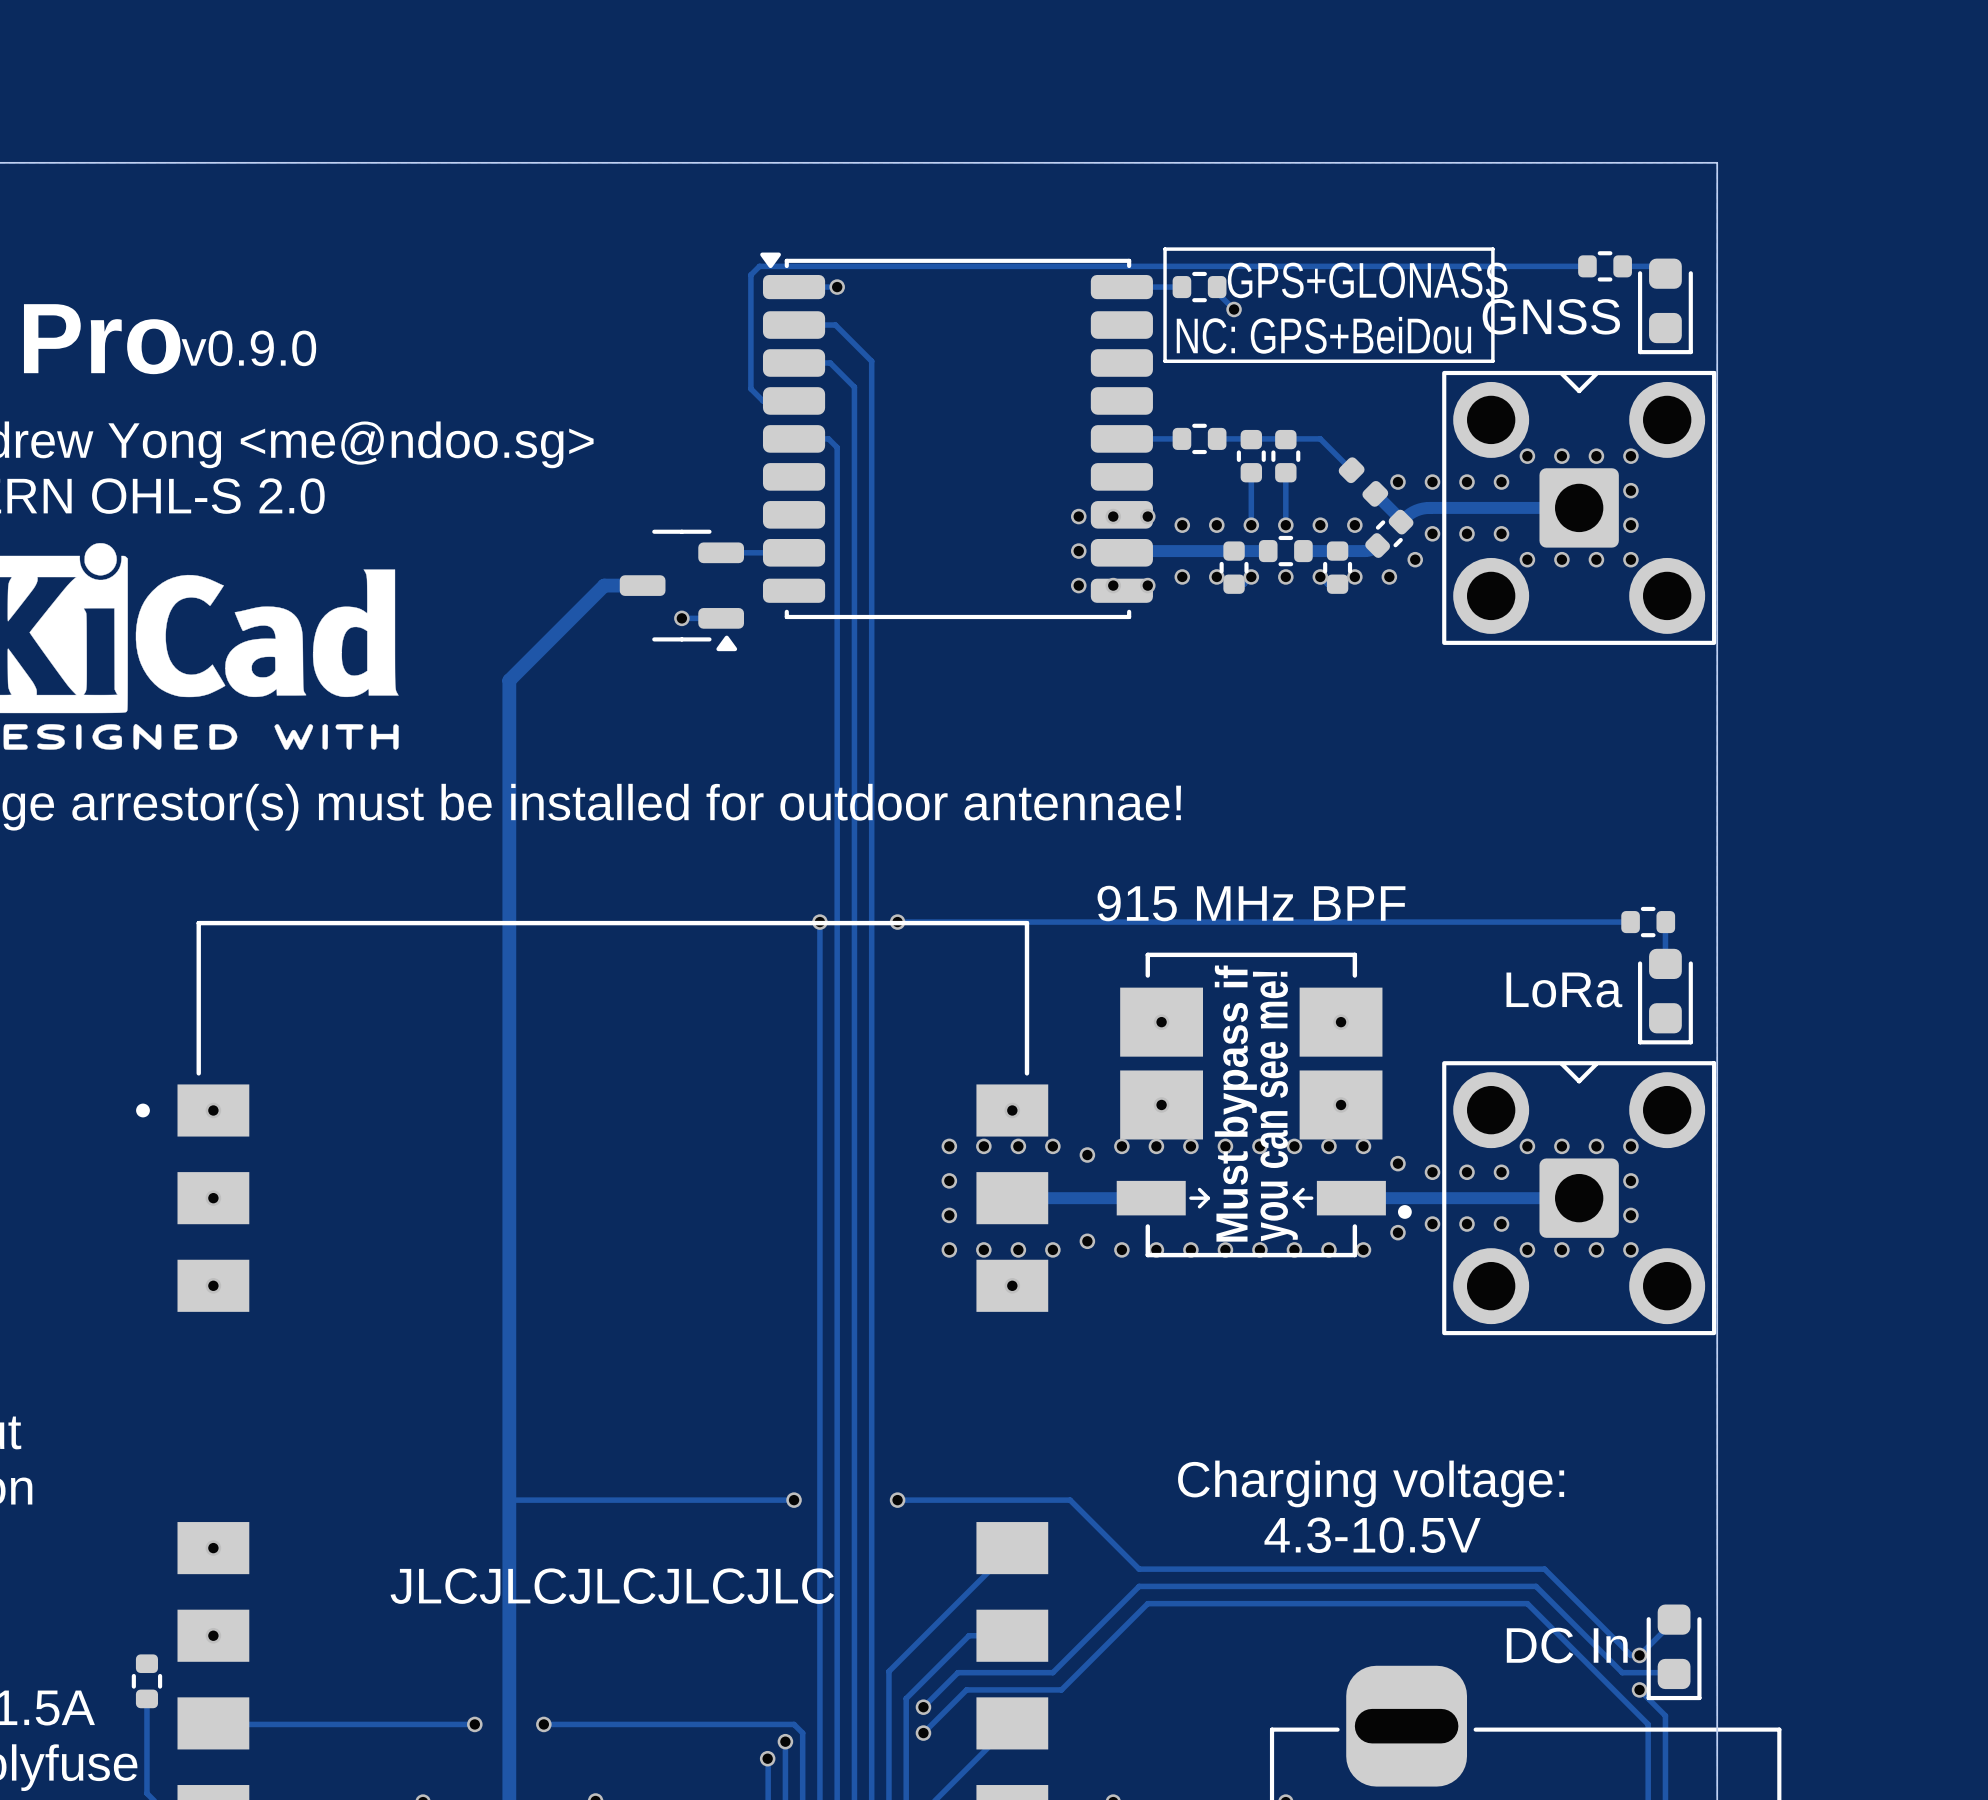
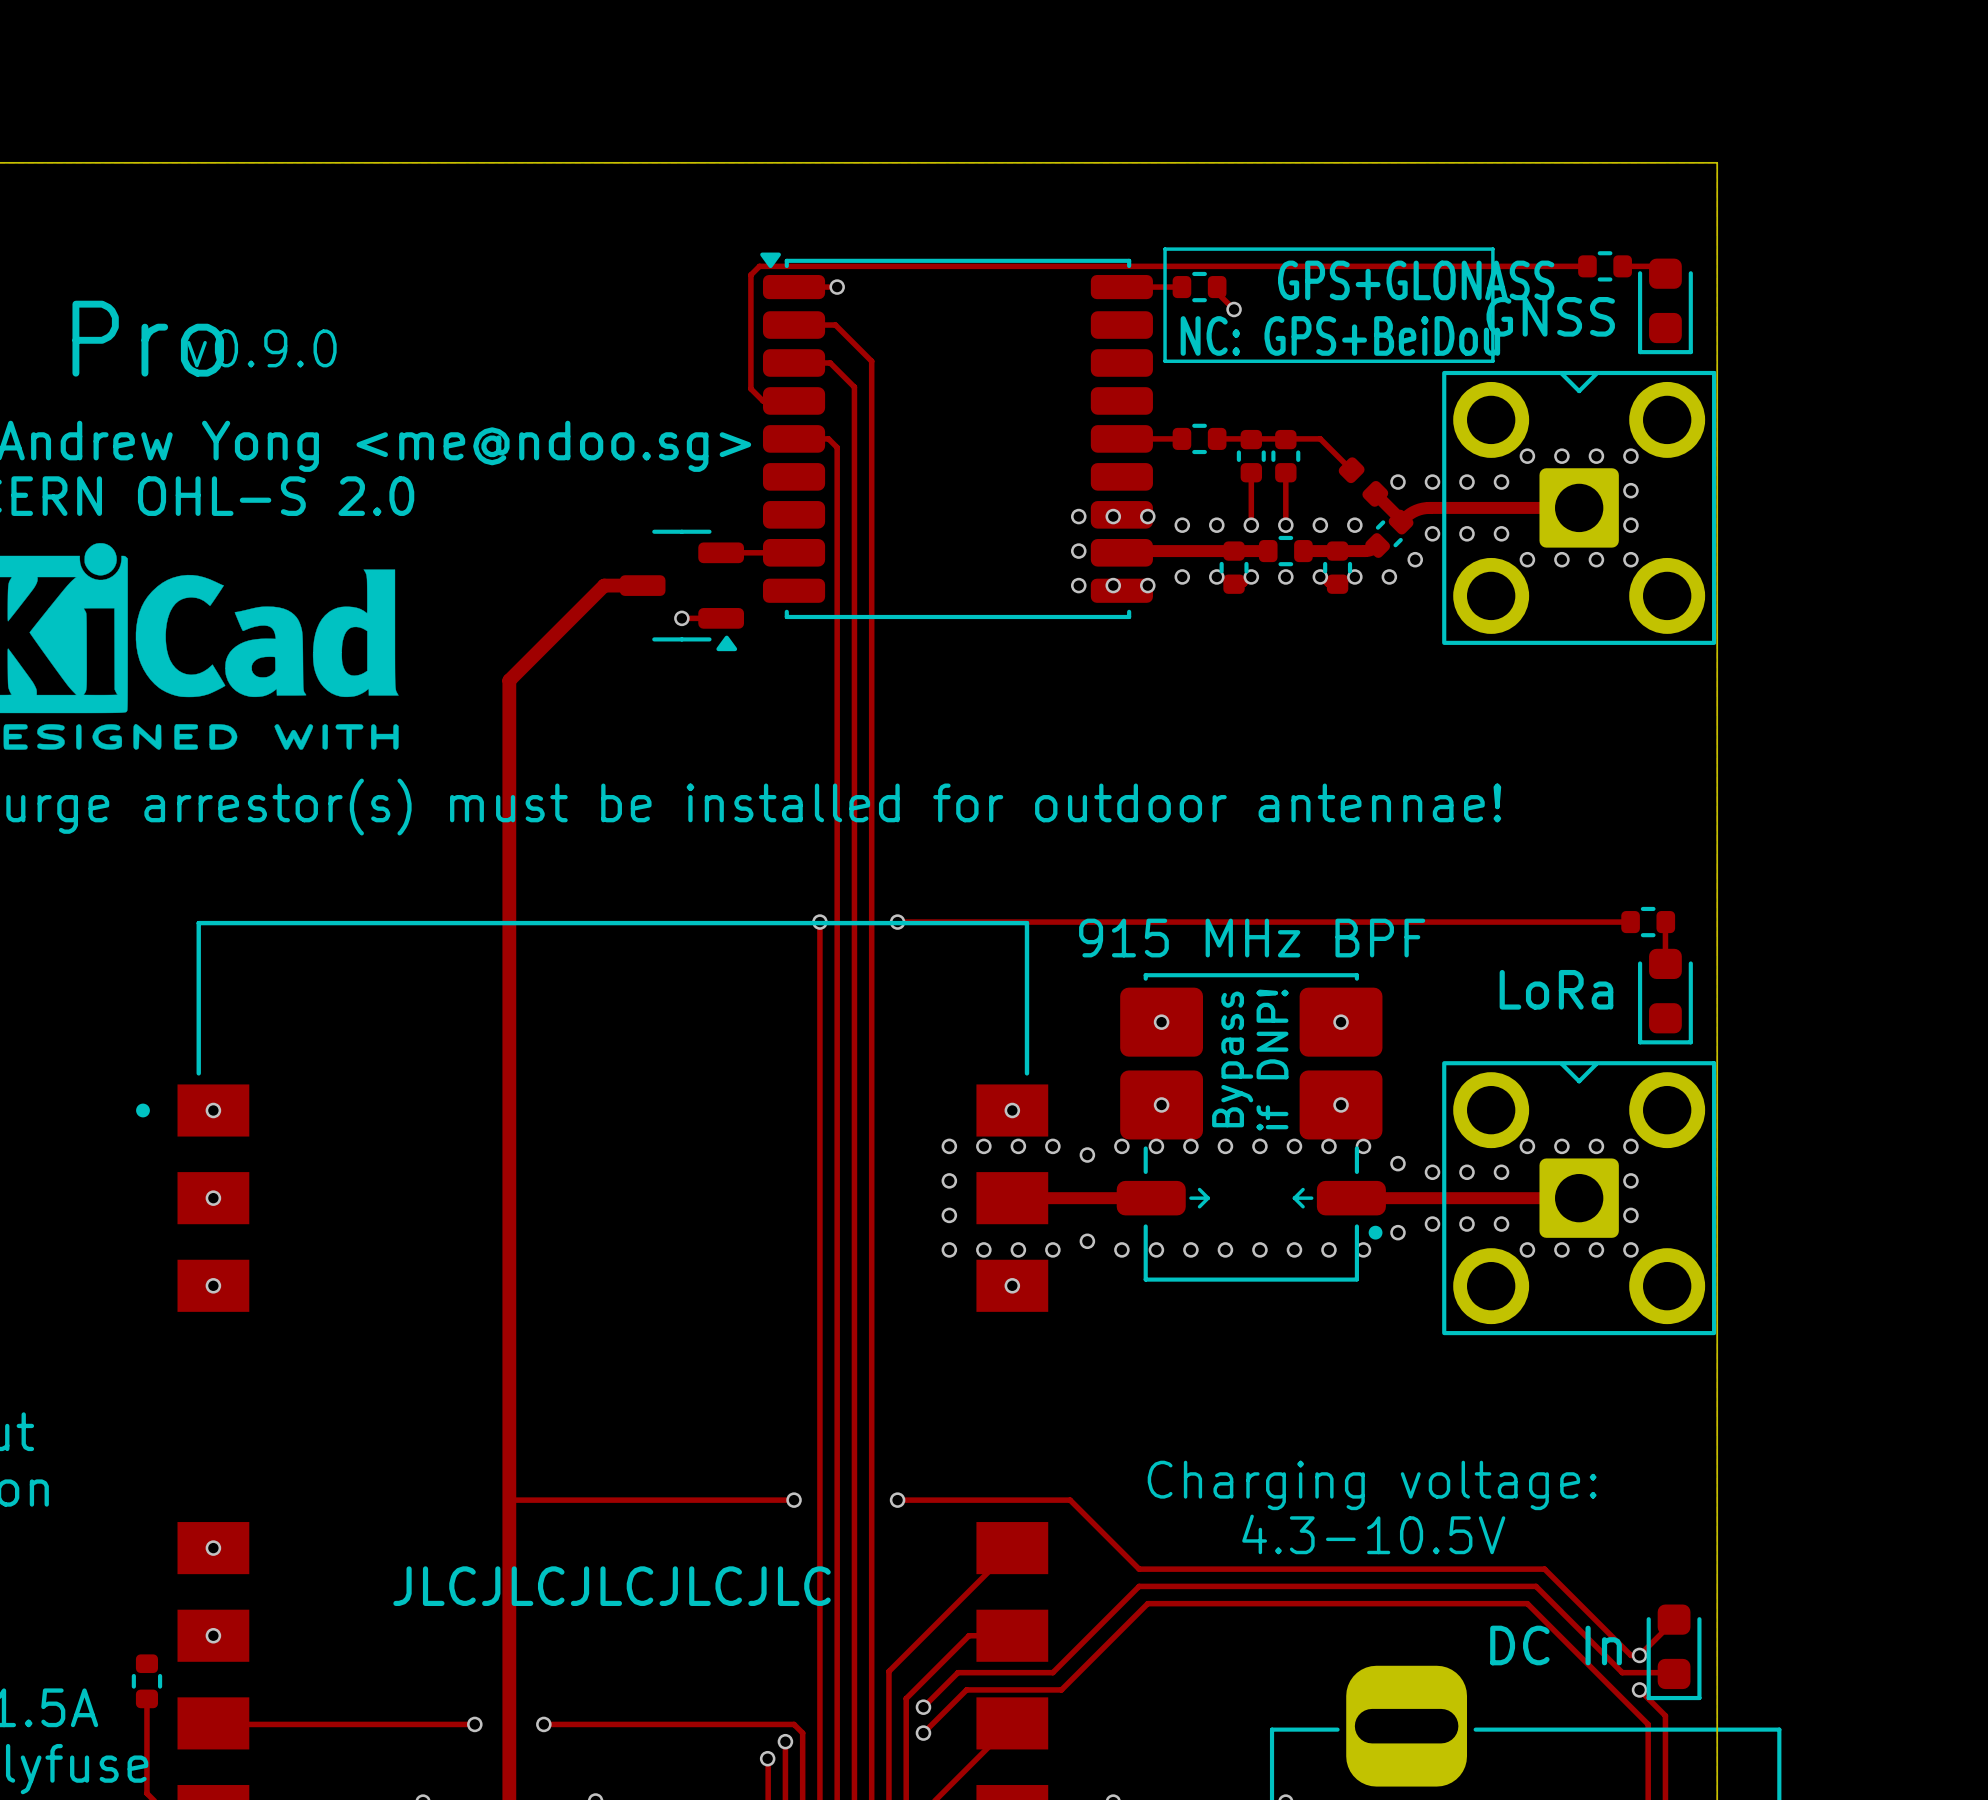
text position: 915 MHz BPF (1251, 903) -> 915 MHz BPF (1252, 938)
part footprint: [1116, 952, 1412, 1258] -> [1116, 973, 1386, 1282]
text: none -> Bypass (1232, 1059)
text: none -> if DNP! (1272, 1060)
text: Must bypass if (1235, 1103) -> none
text: you can see me! (1275, 1106) -> none

